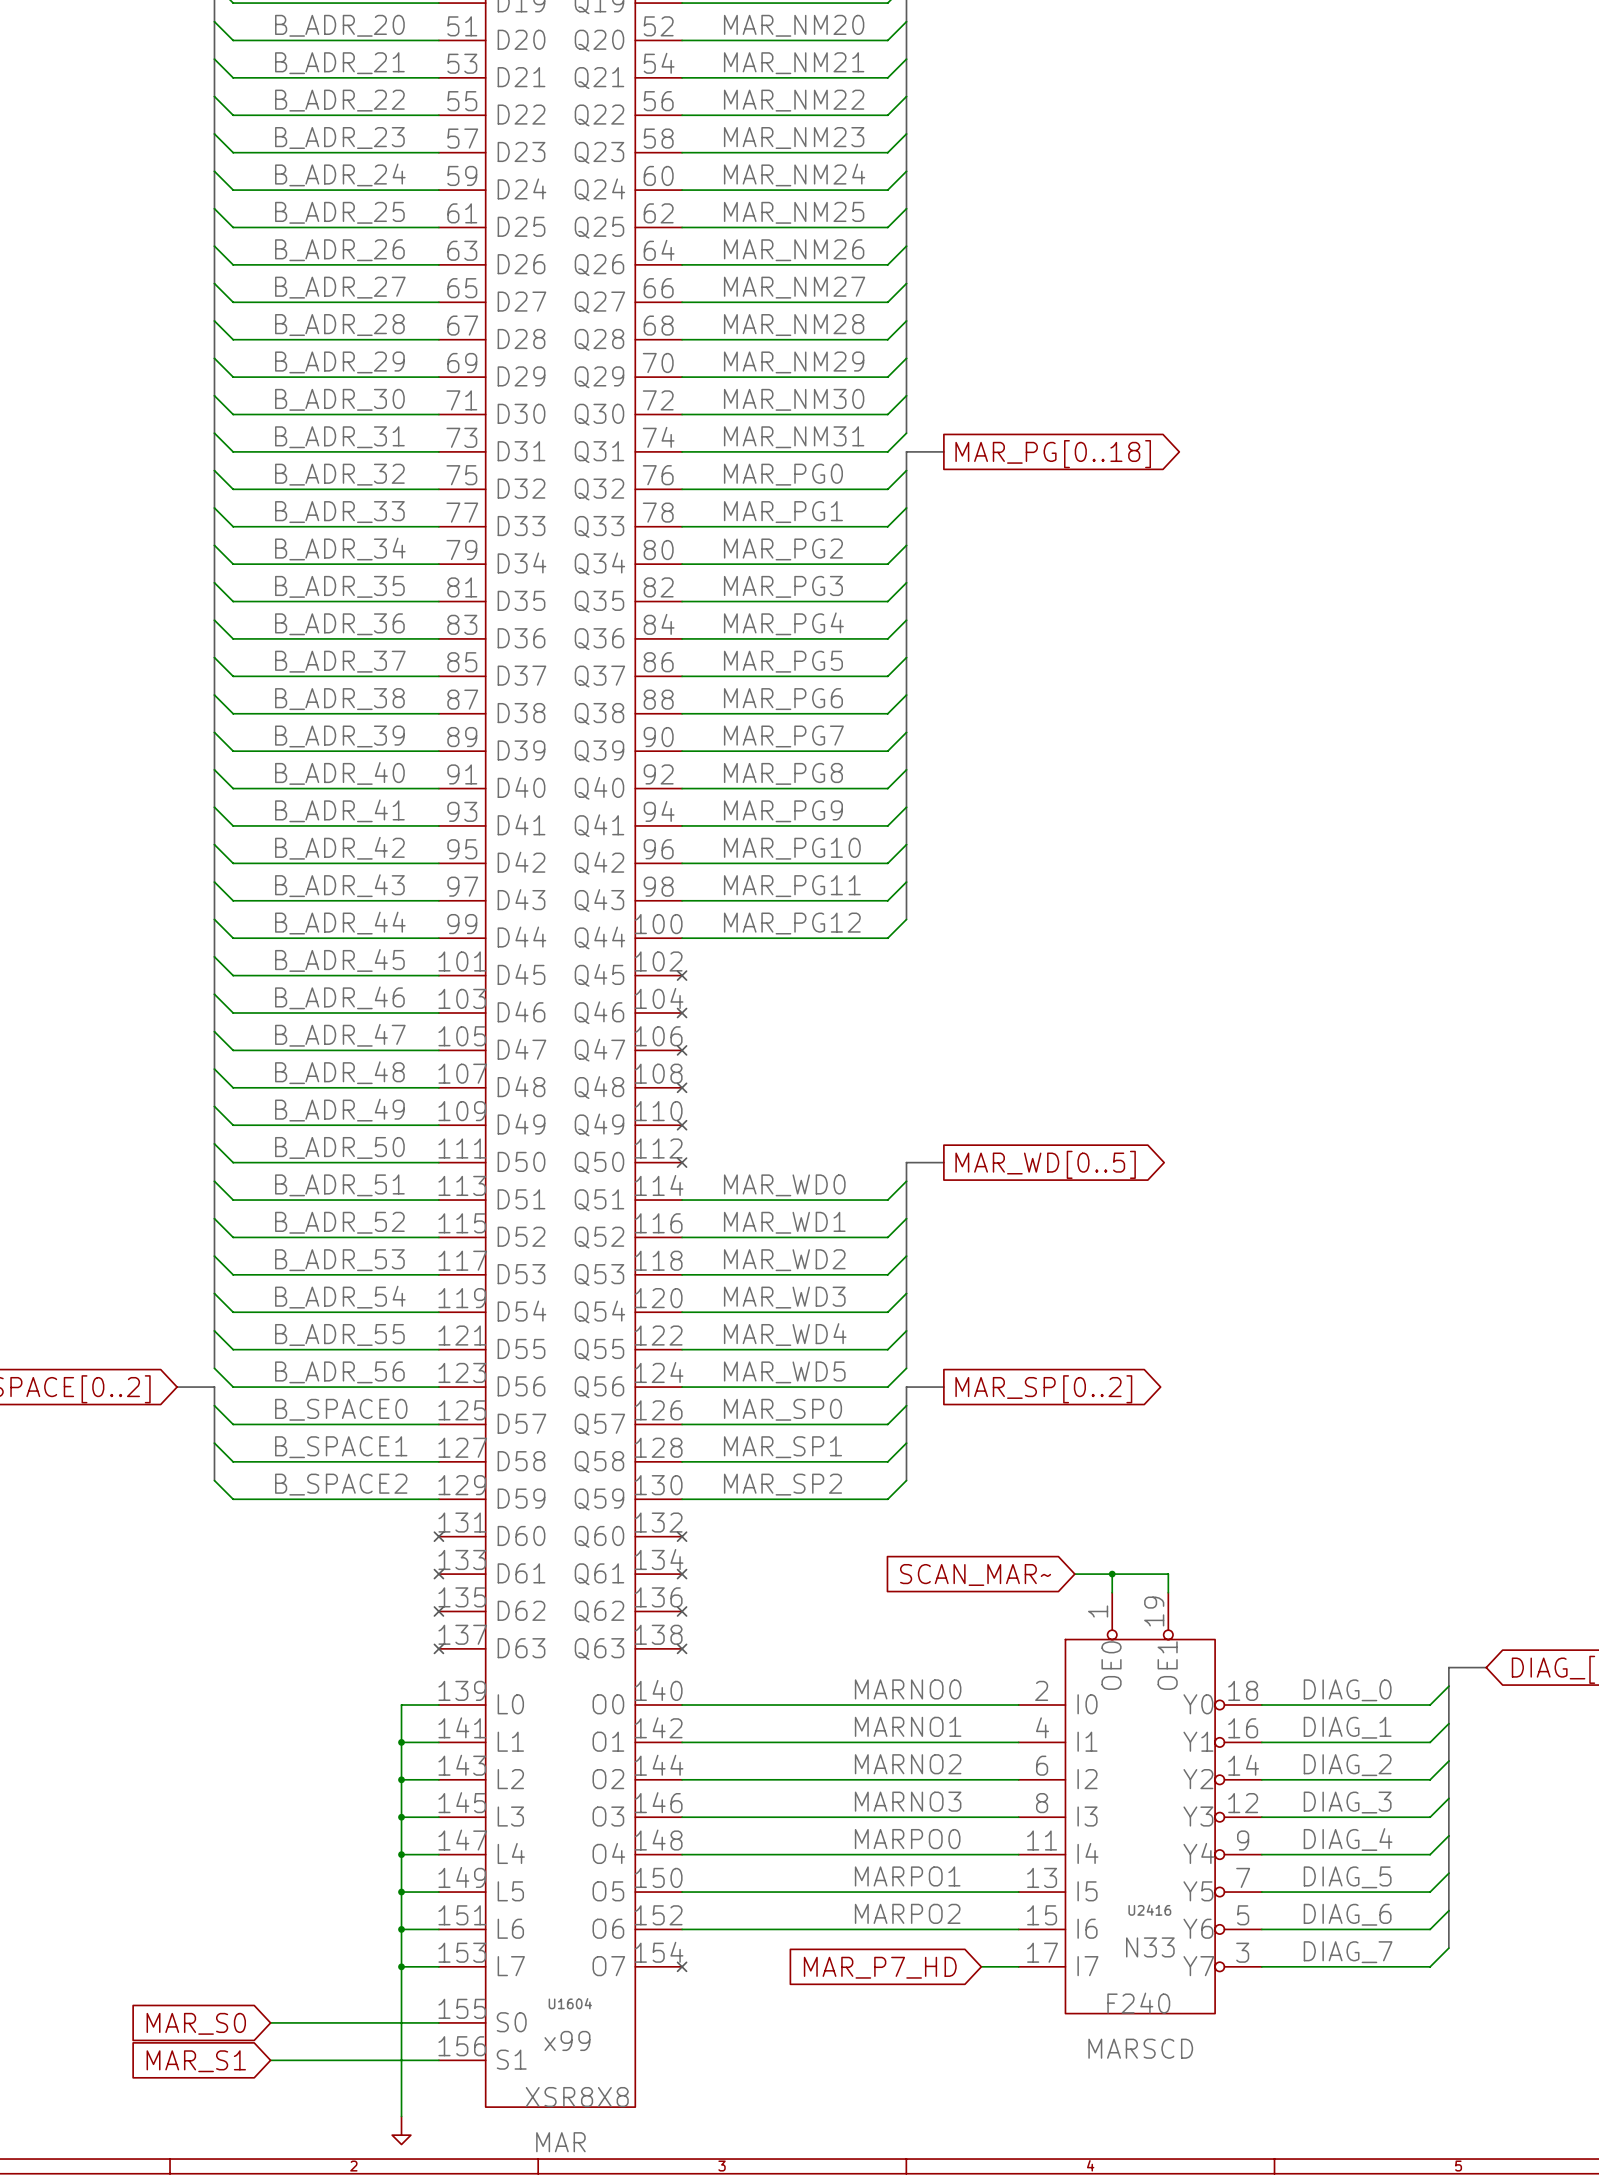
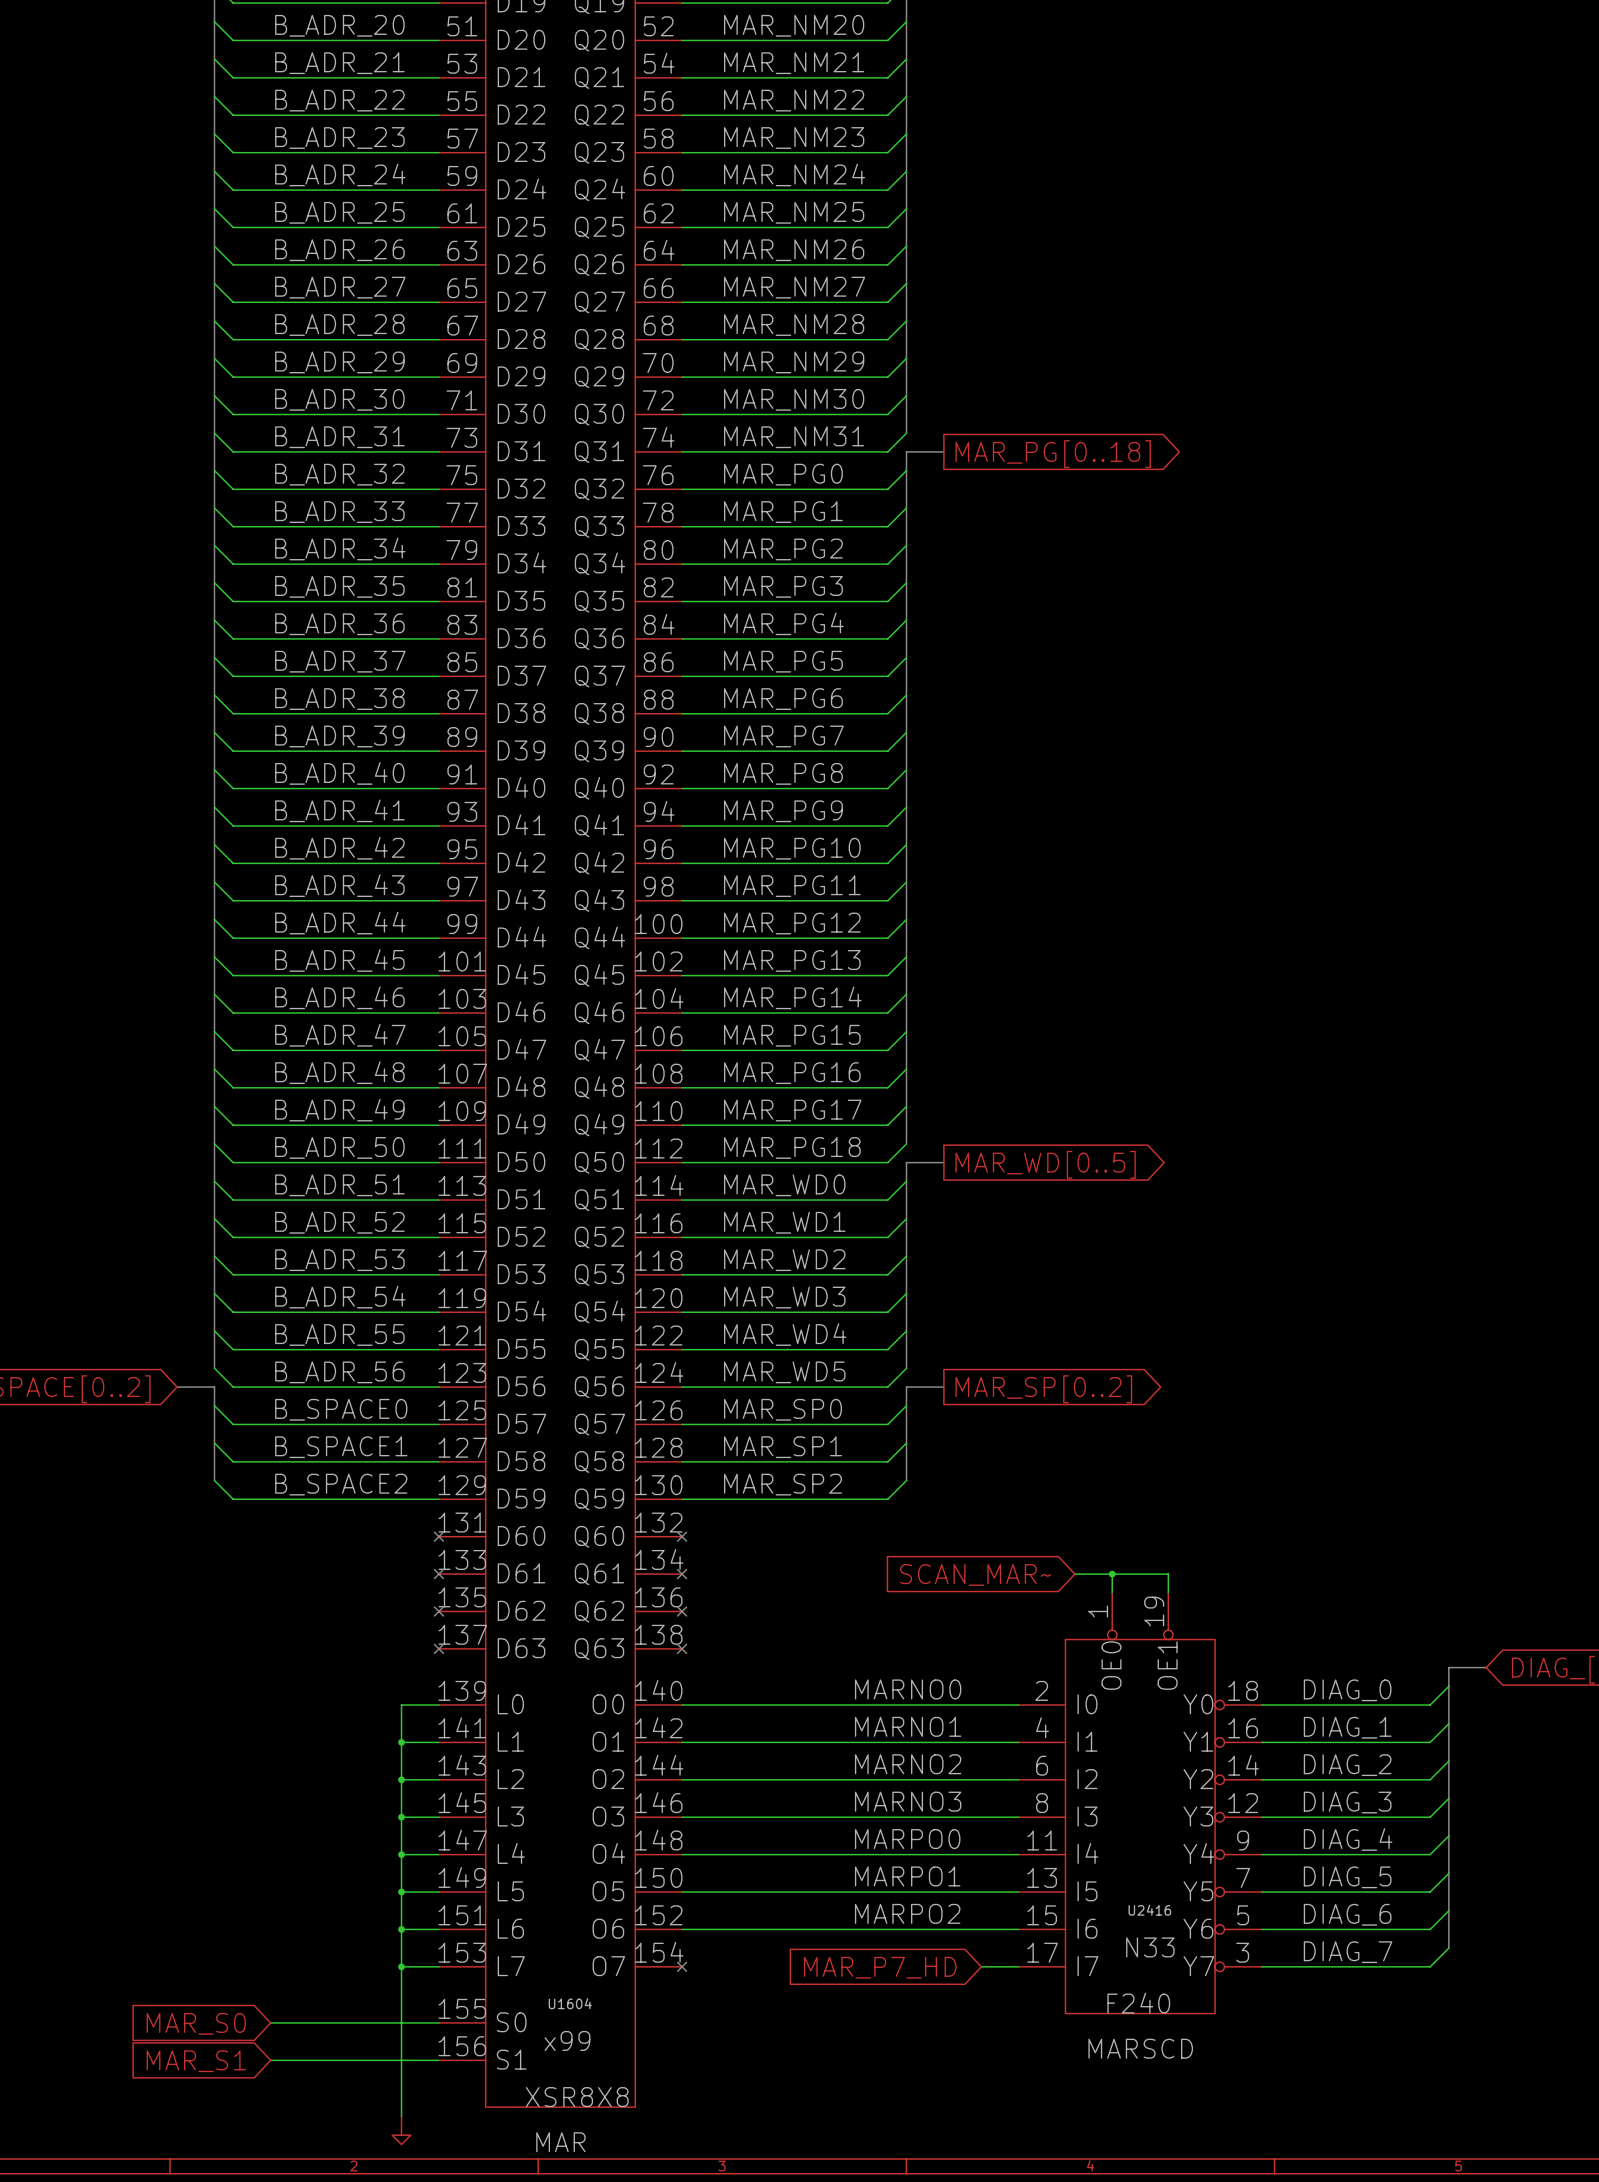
bus: none -> (906, 919) (906, 1143)
wire: none -> (906, 956) (887, 975) (682, 975)
label: none -> MAR_PG13 (792, 960)
no-connect mark: (682, 975) -> none
wire: none -> (906, 994) (887, 1013) (682, 1013)
label: none -> MAR_PG14 (792, 997)
no-connect mark: (682, 1013) -> none
wire: none -> (906, 1031) (887, 1050) (682, 1050)
label: none -> MAR_PG15 (792, 1035)
no-connect mark: (682, 1050) -> none
wire: none -> (906, 1069) (887, 1087) (682, 1087)
label: none -> MAR_PG16 (792, 1073)
no-connect mark: (682, 1087) -> none
wire: none -> (906, 1106) (887, 1125) (682, 1125)
label: none -> MAR_PG17 (792, 1110)
no-connect mark: (682, 1125) -> none
wire: none -> (906, 1143) (887, 1162) (682, 1162)
label: none -> MAR_PG18 (792, 1147)
no-connect mark: (682, 1162) -> none

